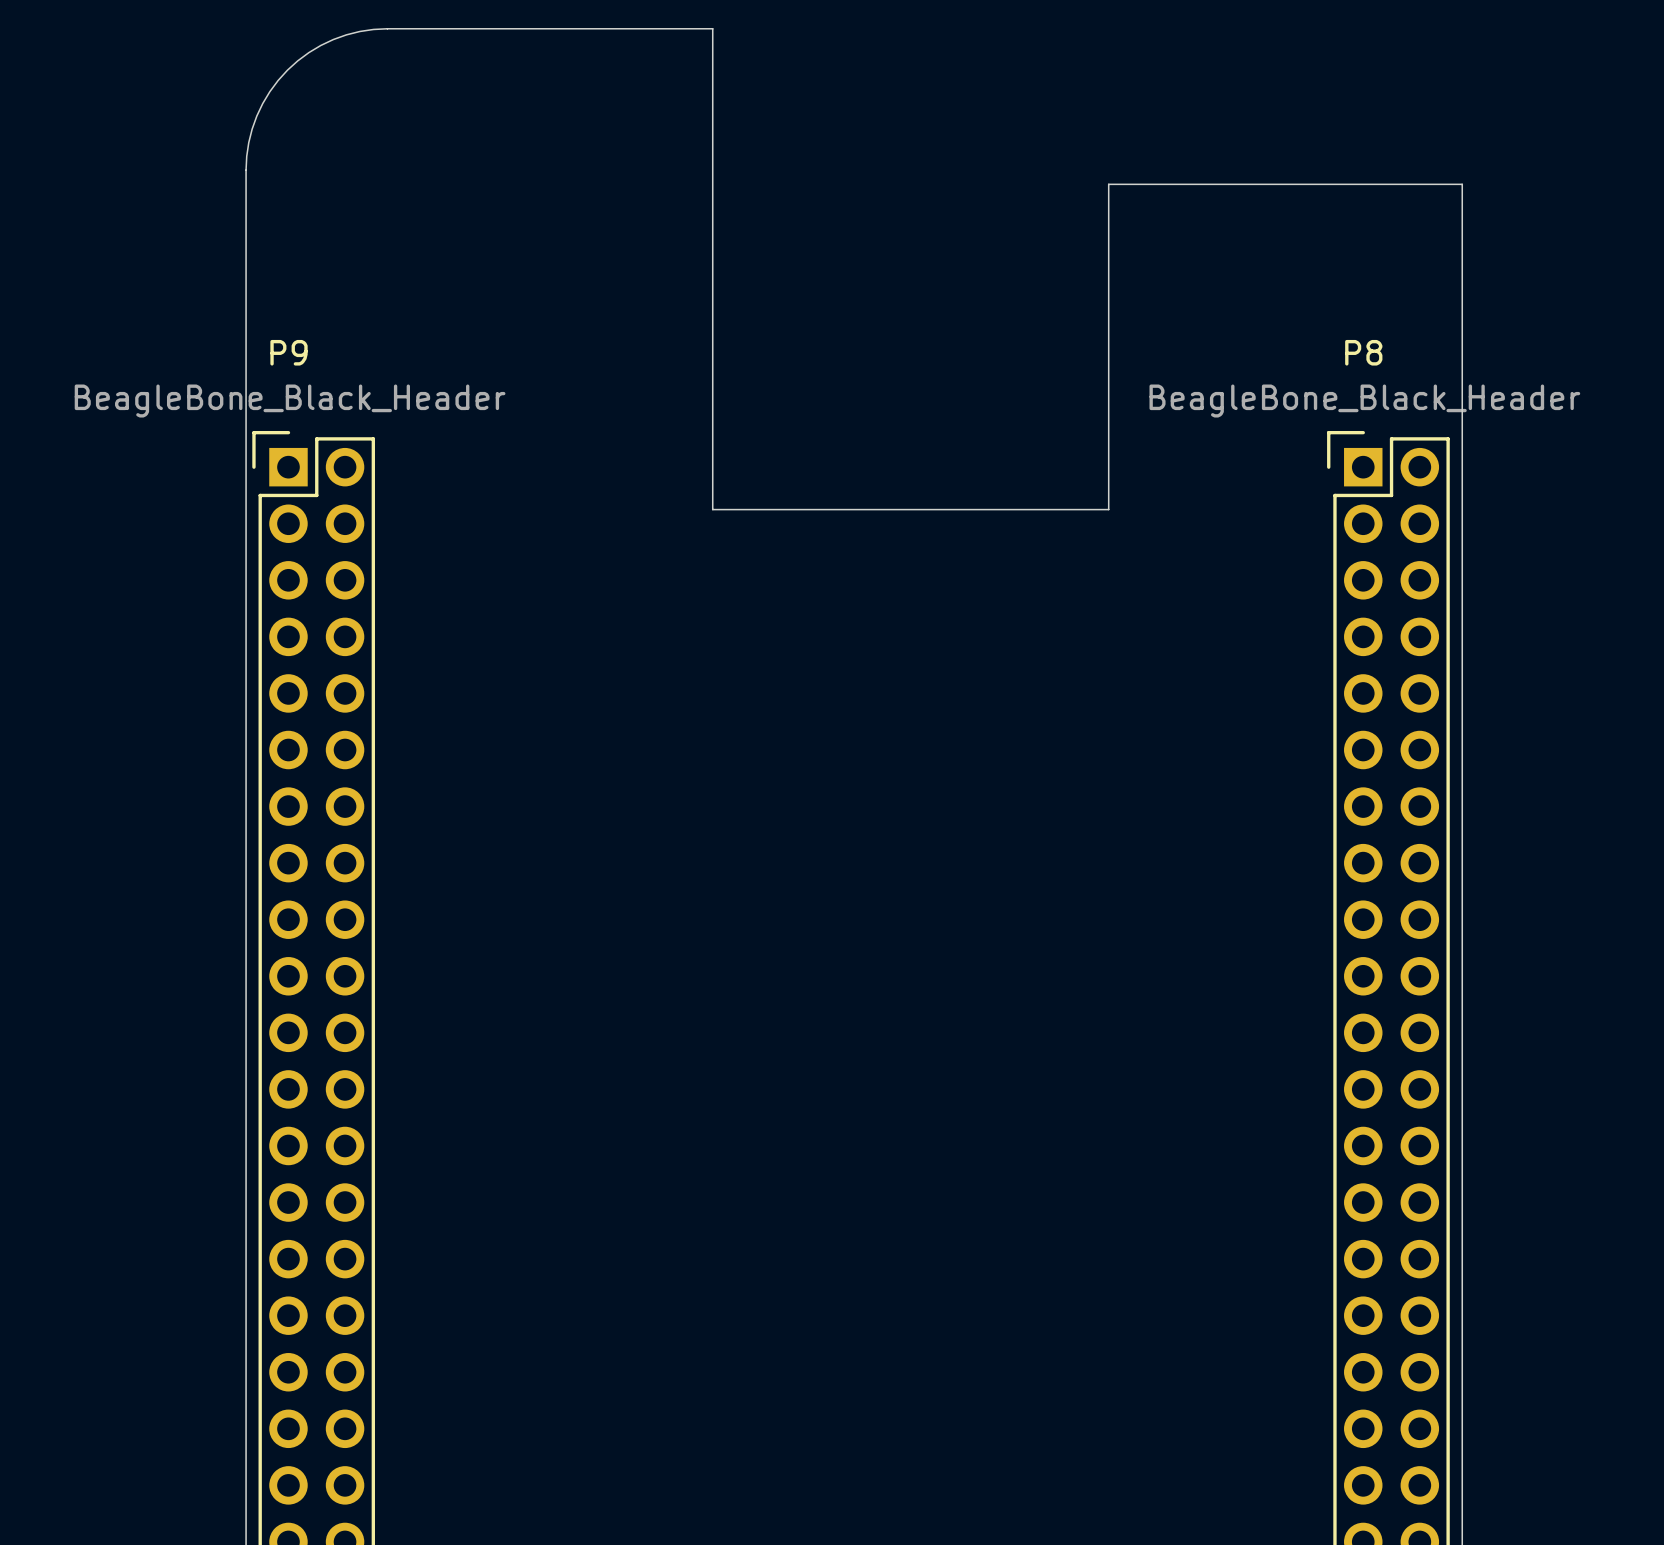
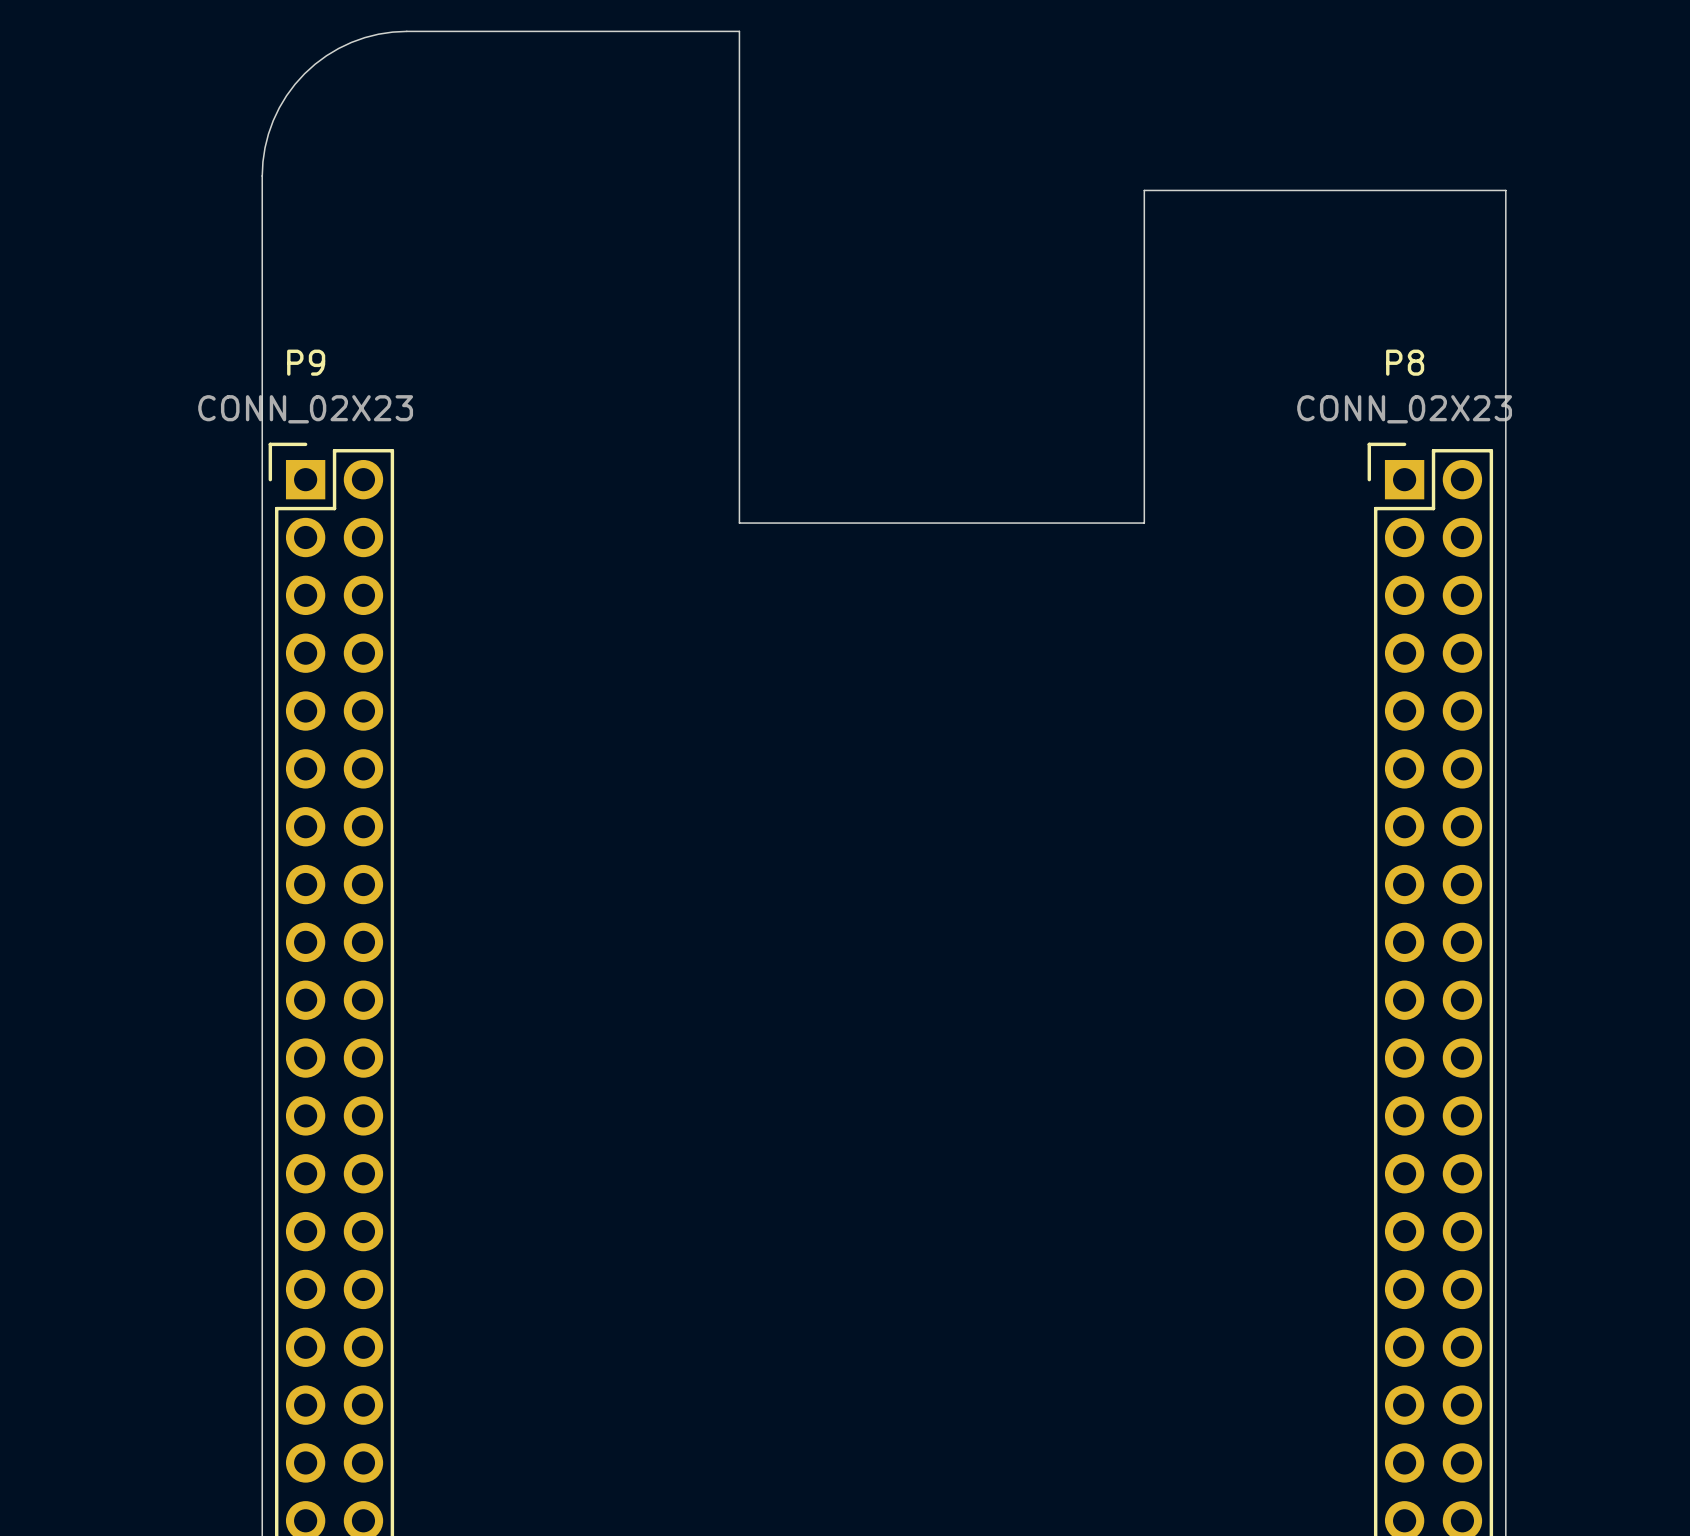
P9 value: BeagleBone_Black_Header (290, 401) -> CONN_02X23 (305, 409)
P8 value: BeagleBone_Black_Header (1364, 401) -> CONN_02X23 (1404, 409)

